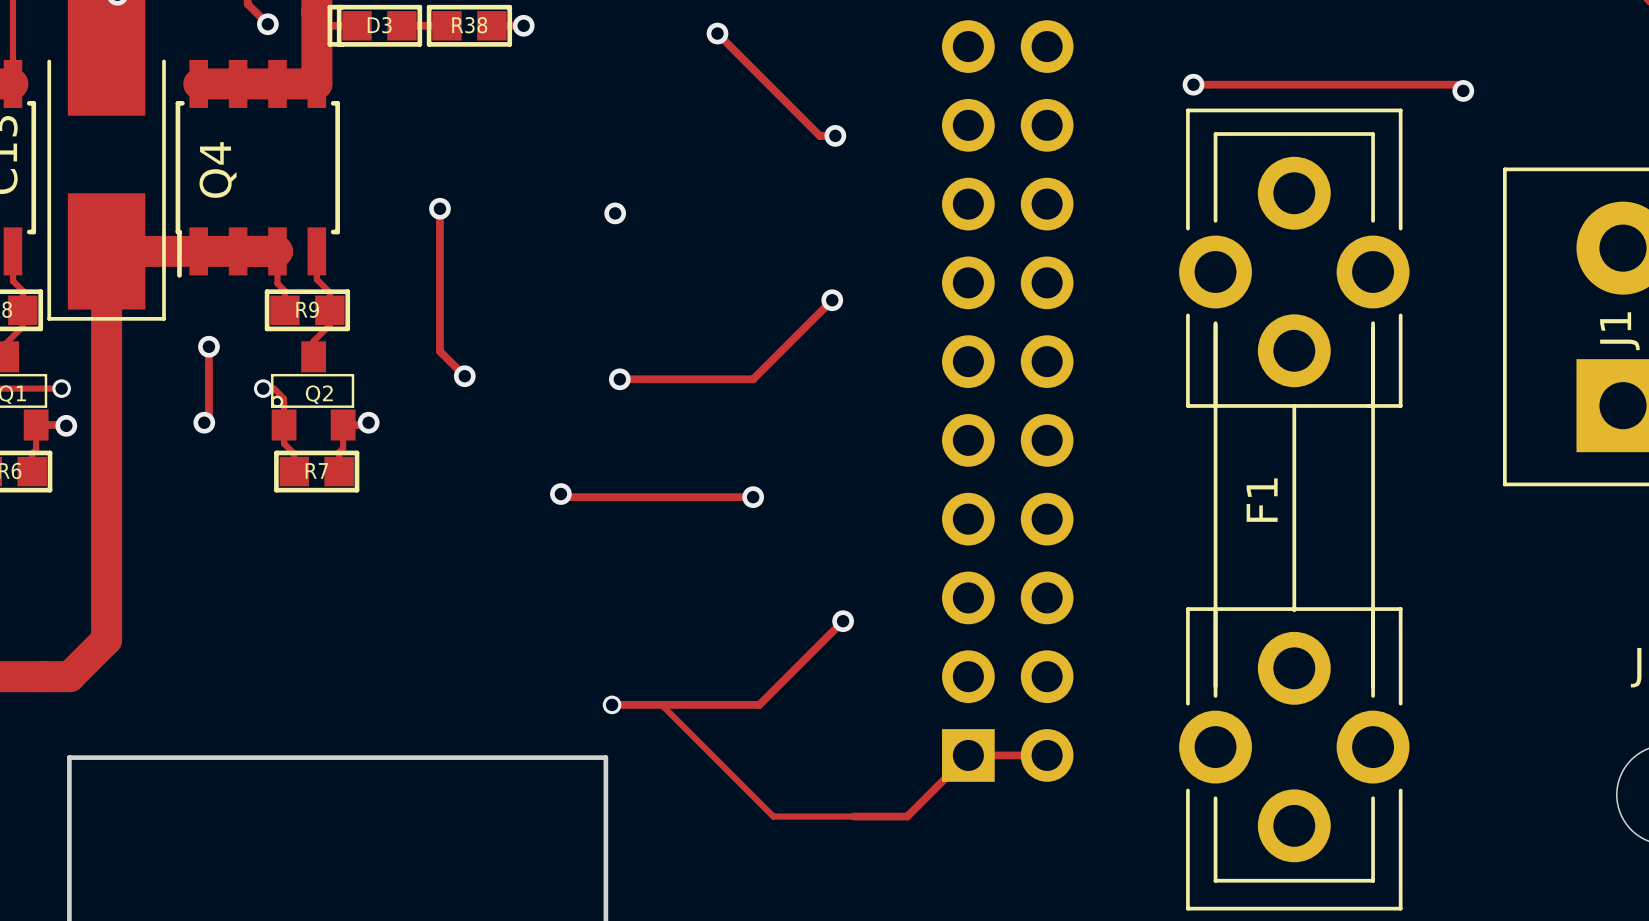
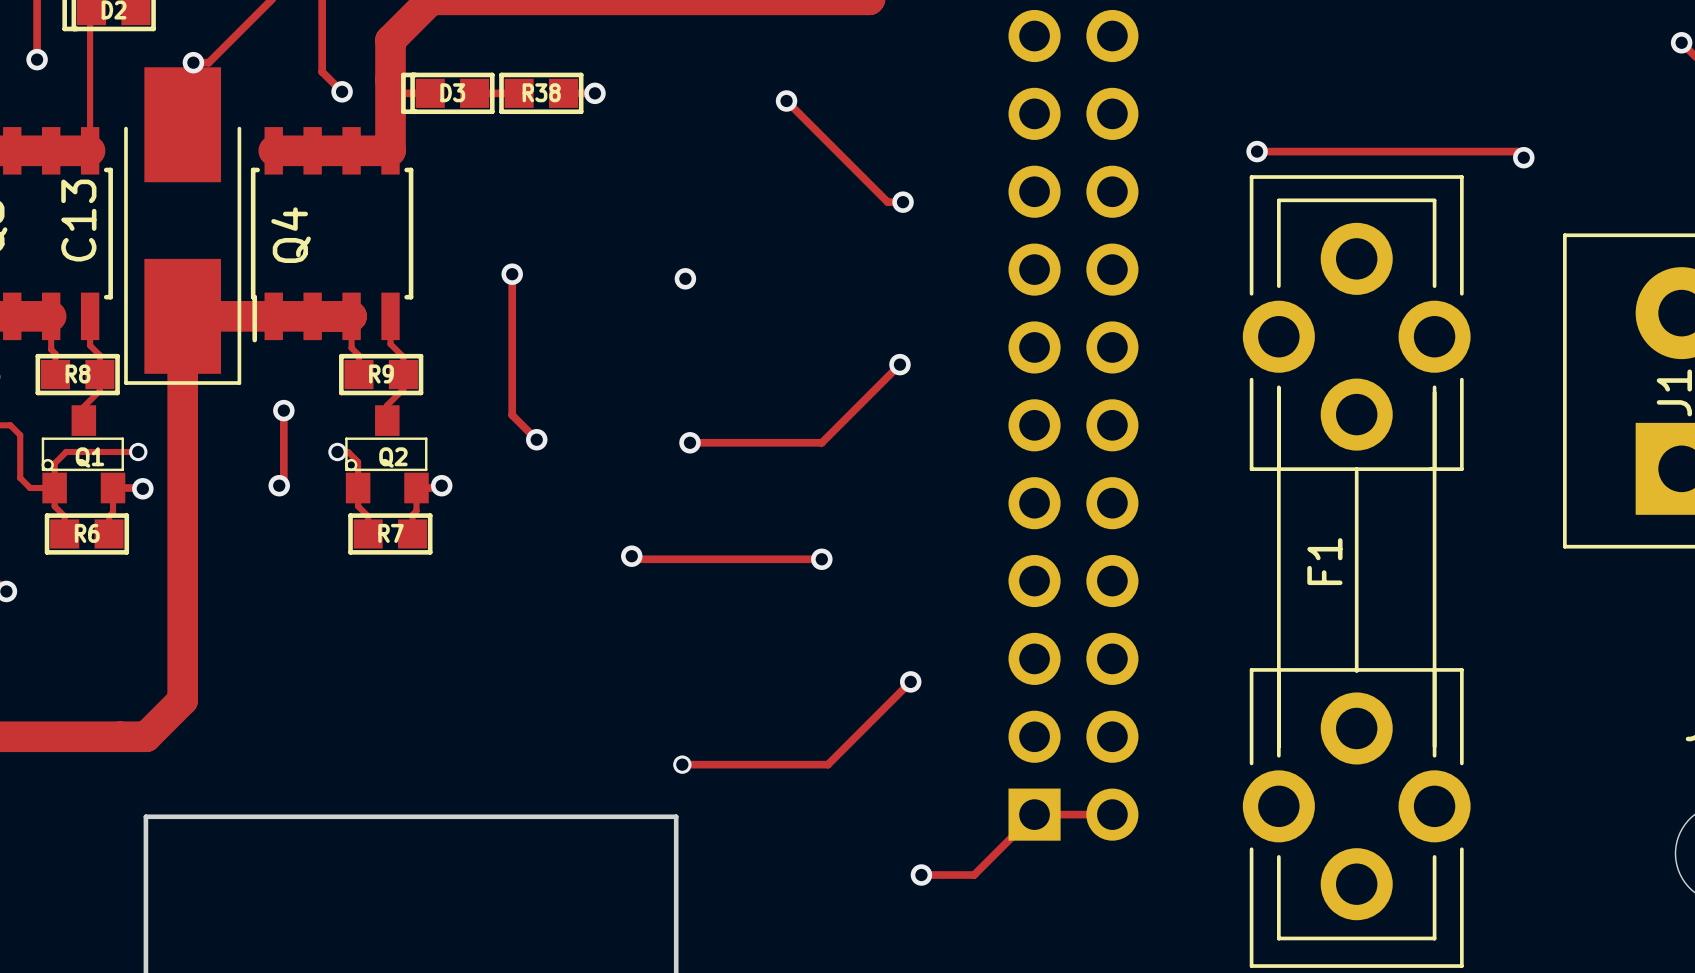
track: (610, 704) (661, 704) (773, 816) (853, 816) -> none
via: none -> (921, 875)

